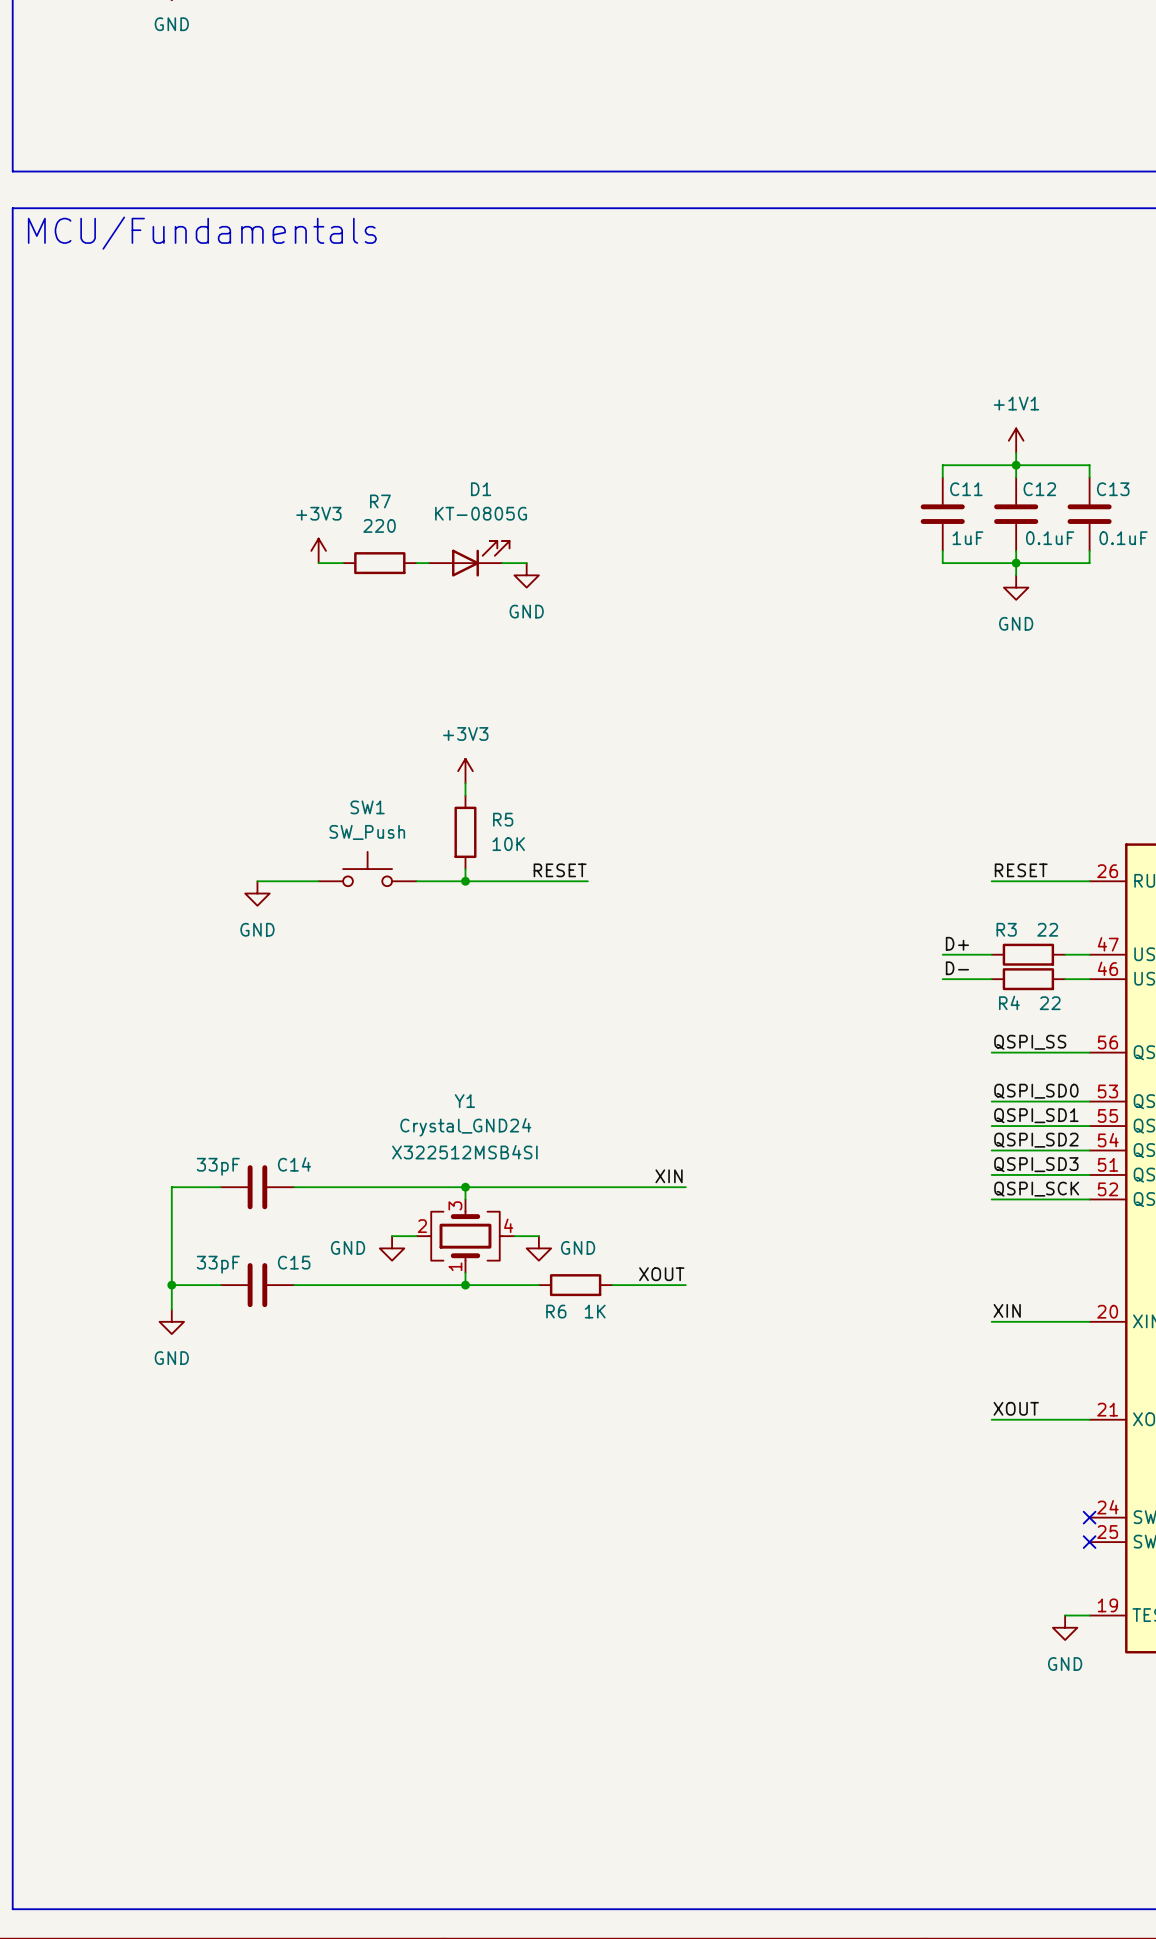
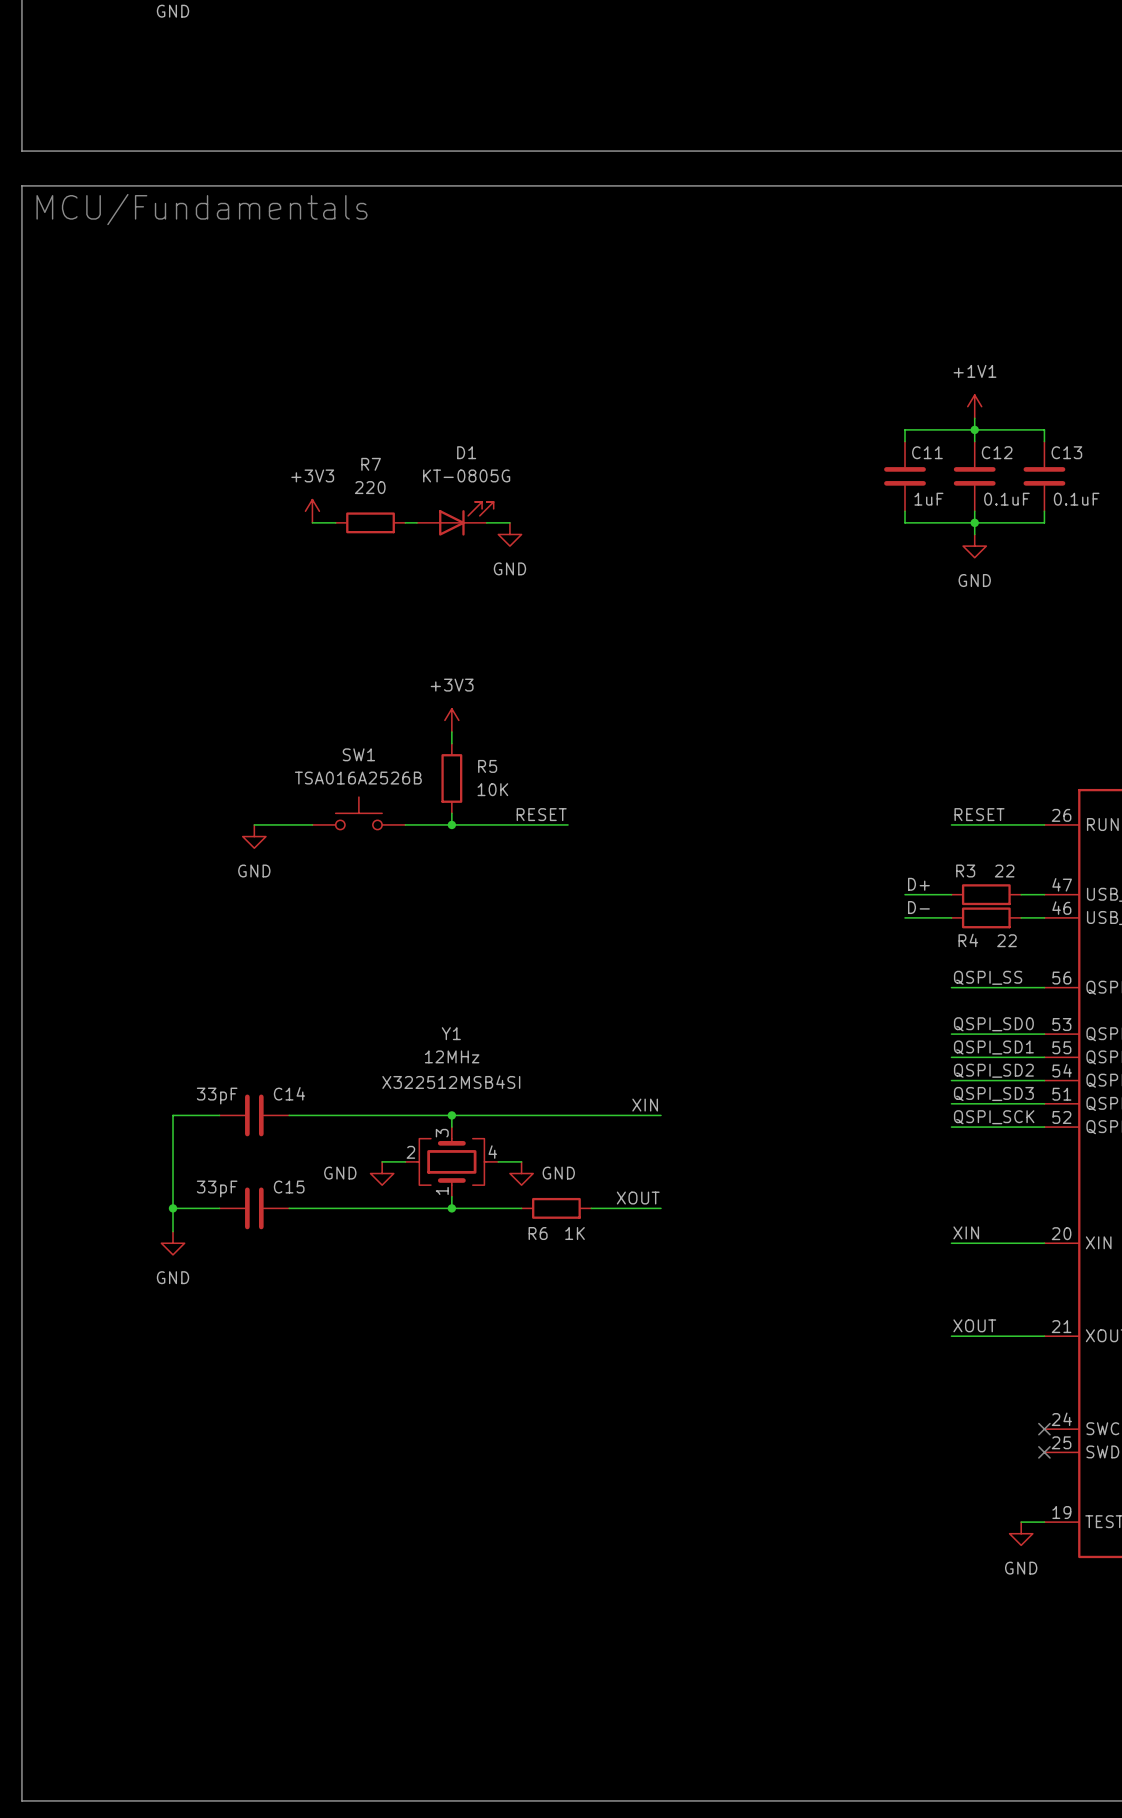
SW1 value: SW_Push (367, 832) -> TSA016A2526B (358, 778)
Y1 value: Crystal_GND24 (465, 1127) -> 12MHz (452, 1056)

